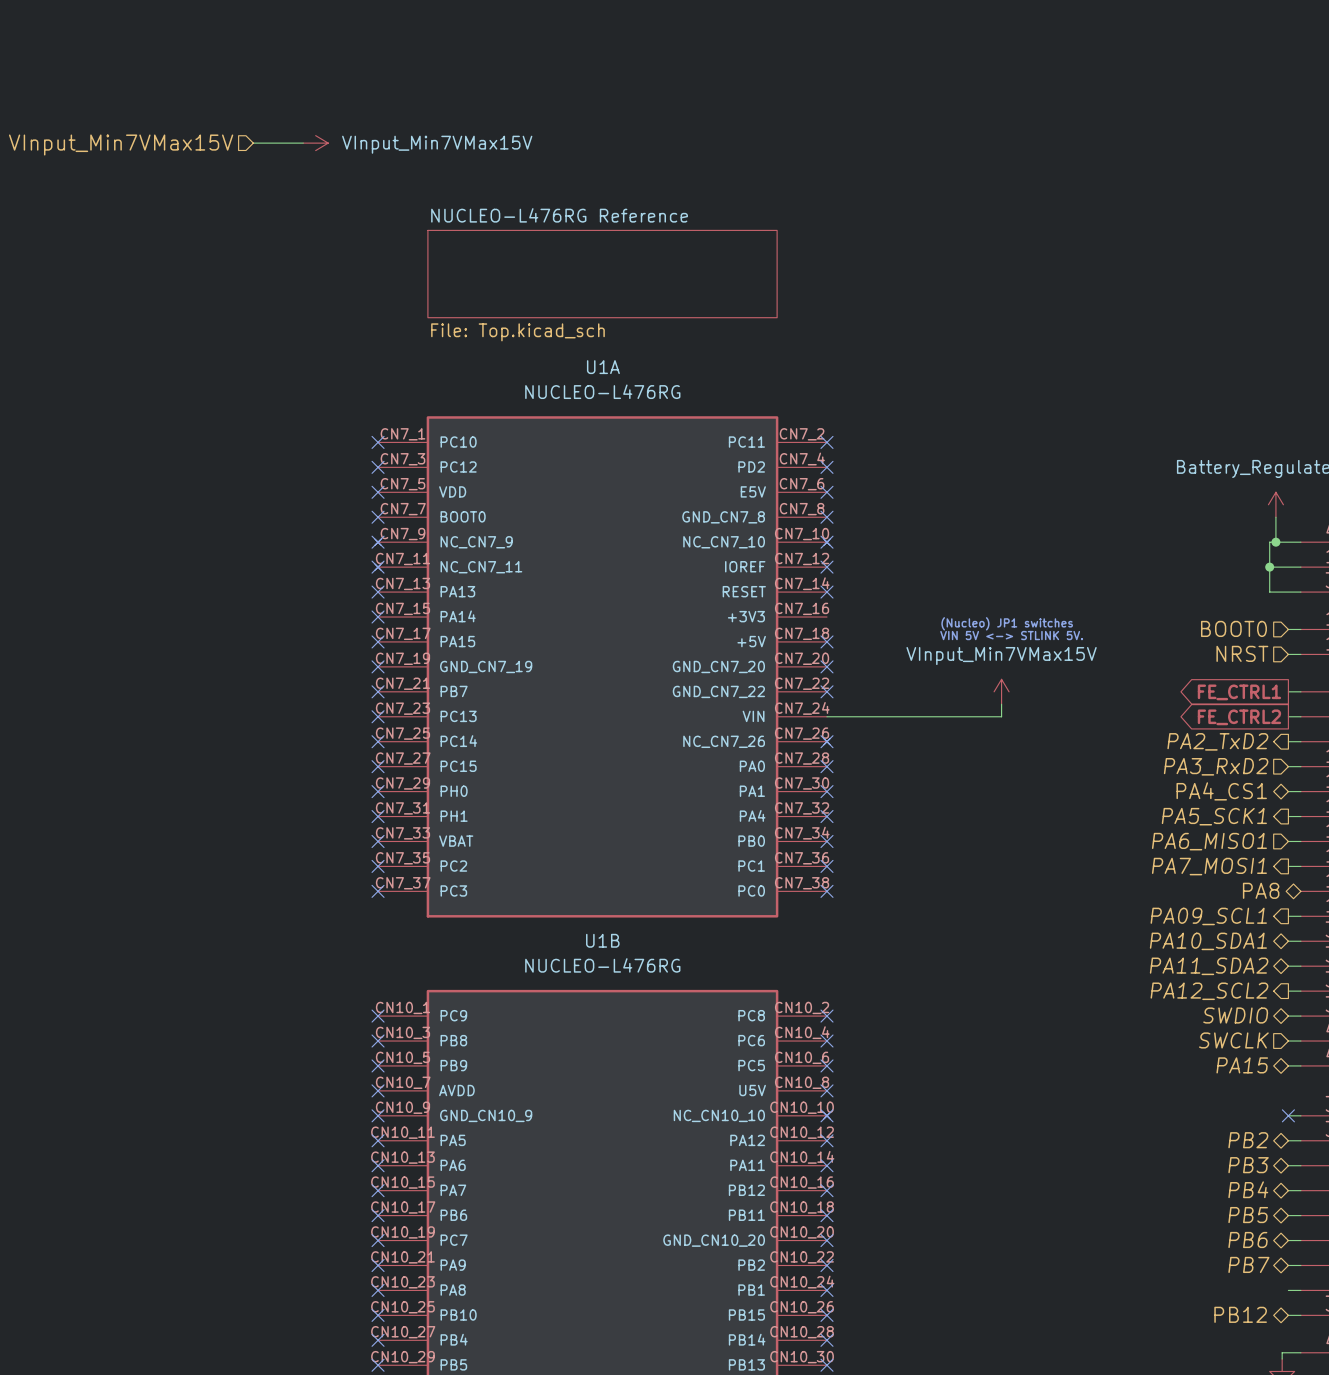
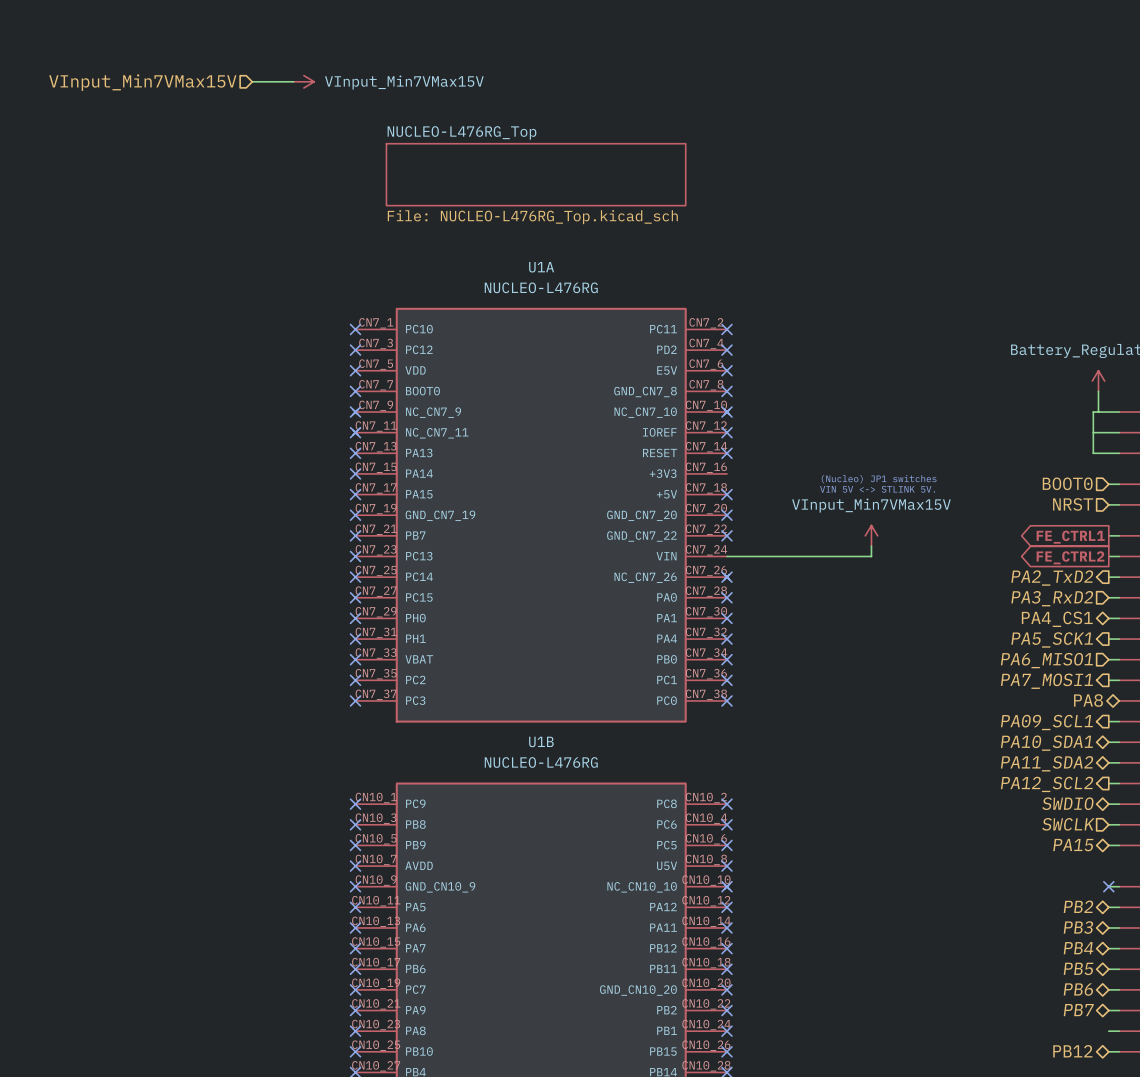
sheet NUCLEO-L476RG_Top: none -> File: NUCLEO-L476RG_Top.kicad_sch (536, 174)
sheet NUCLEO-L476RG Reference: File: Top.kicad_sch (602, 274) -> none
junction: (1275, 542) -> none
junction: (1269, 567) -> none

